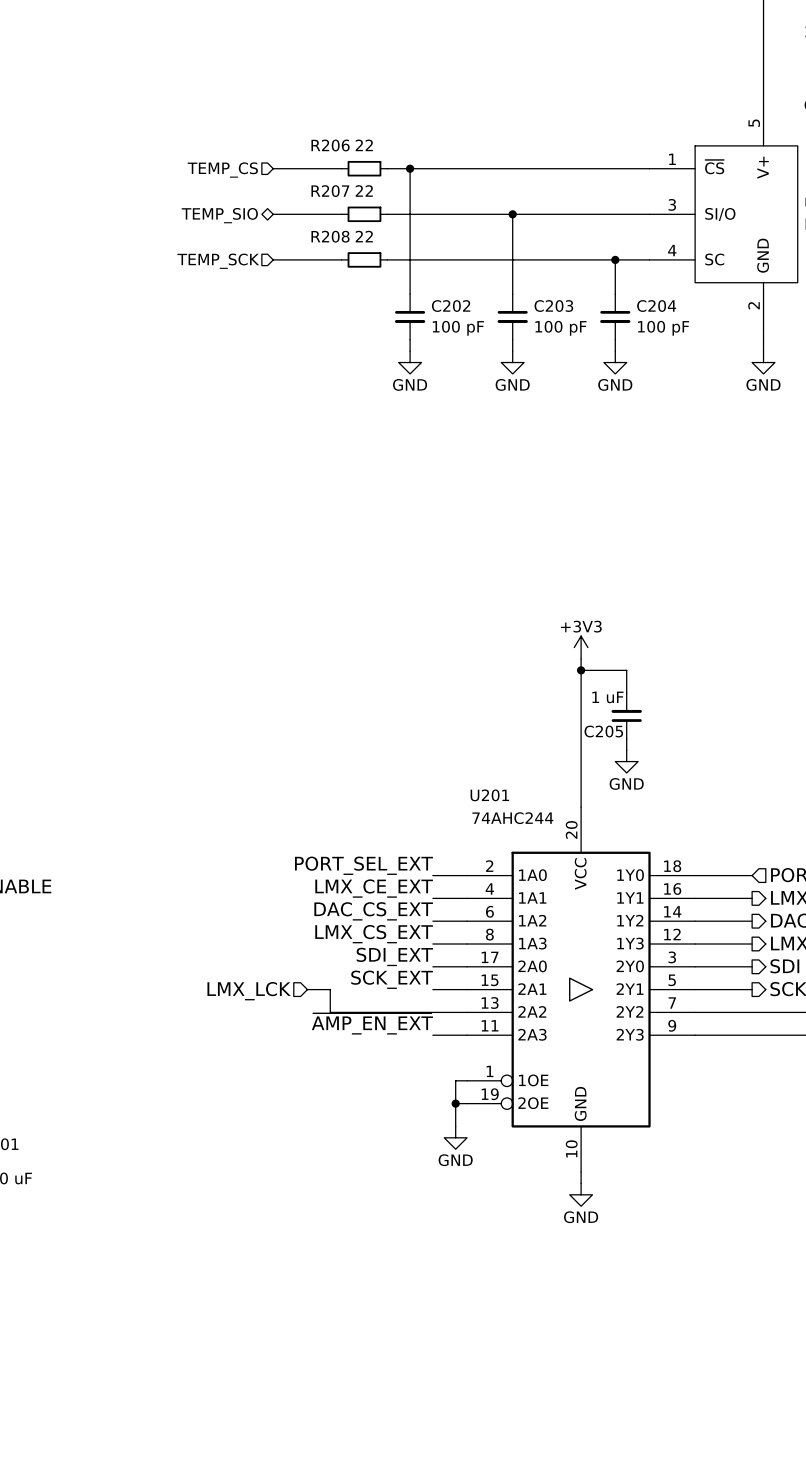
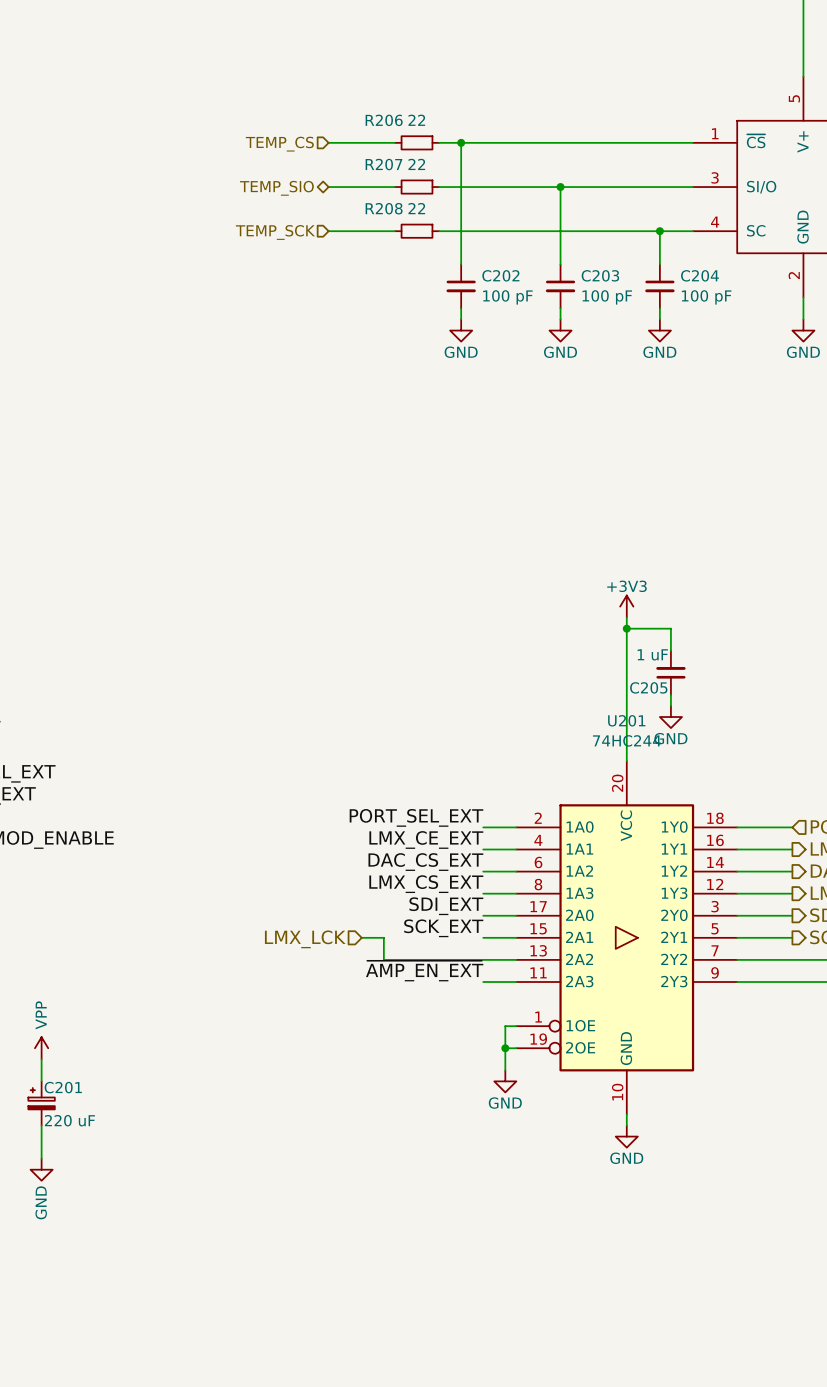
U201 name position: U201 (489, 795) -> U201 (626, 720)
U201 value: 74AHC244 (512, 818) -> 74HC244 (626, 740)

